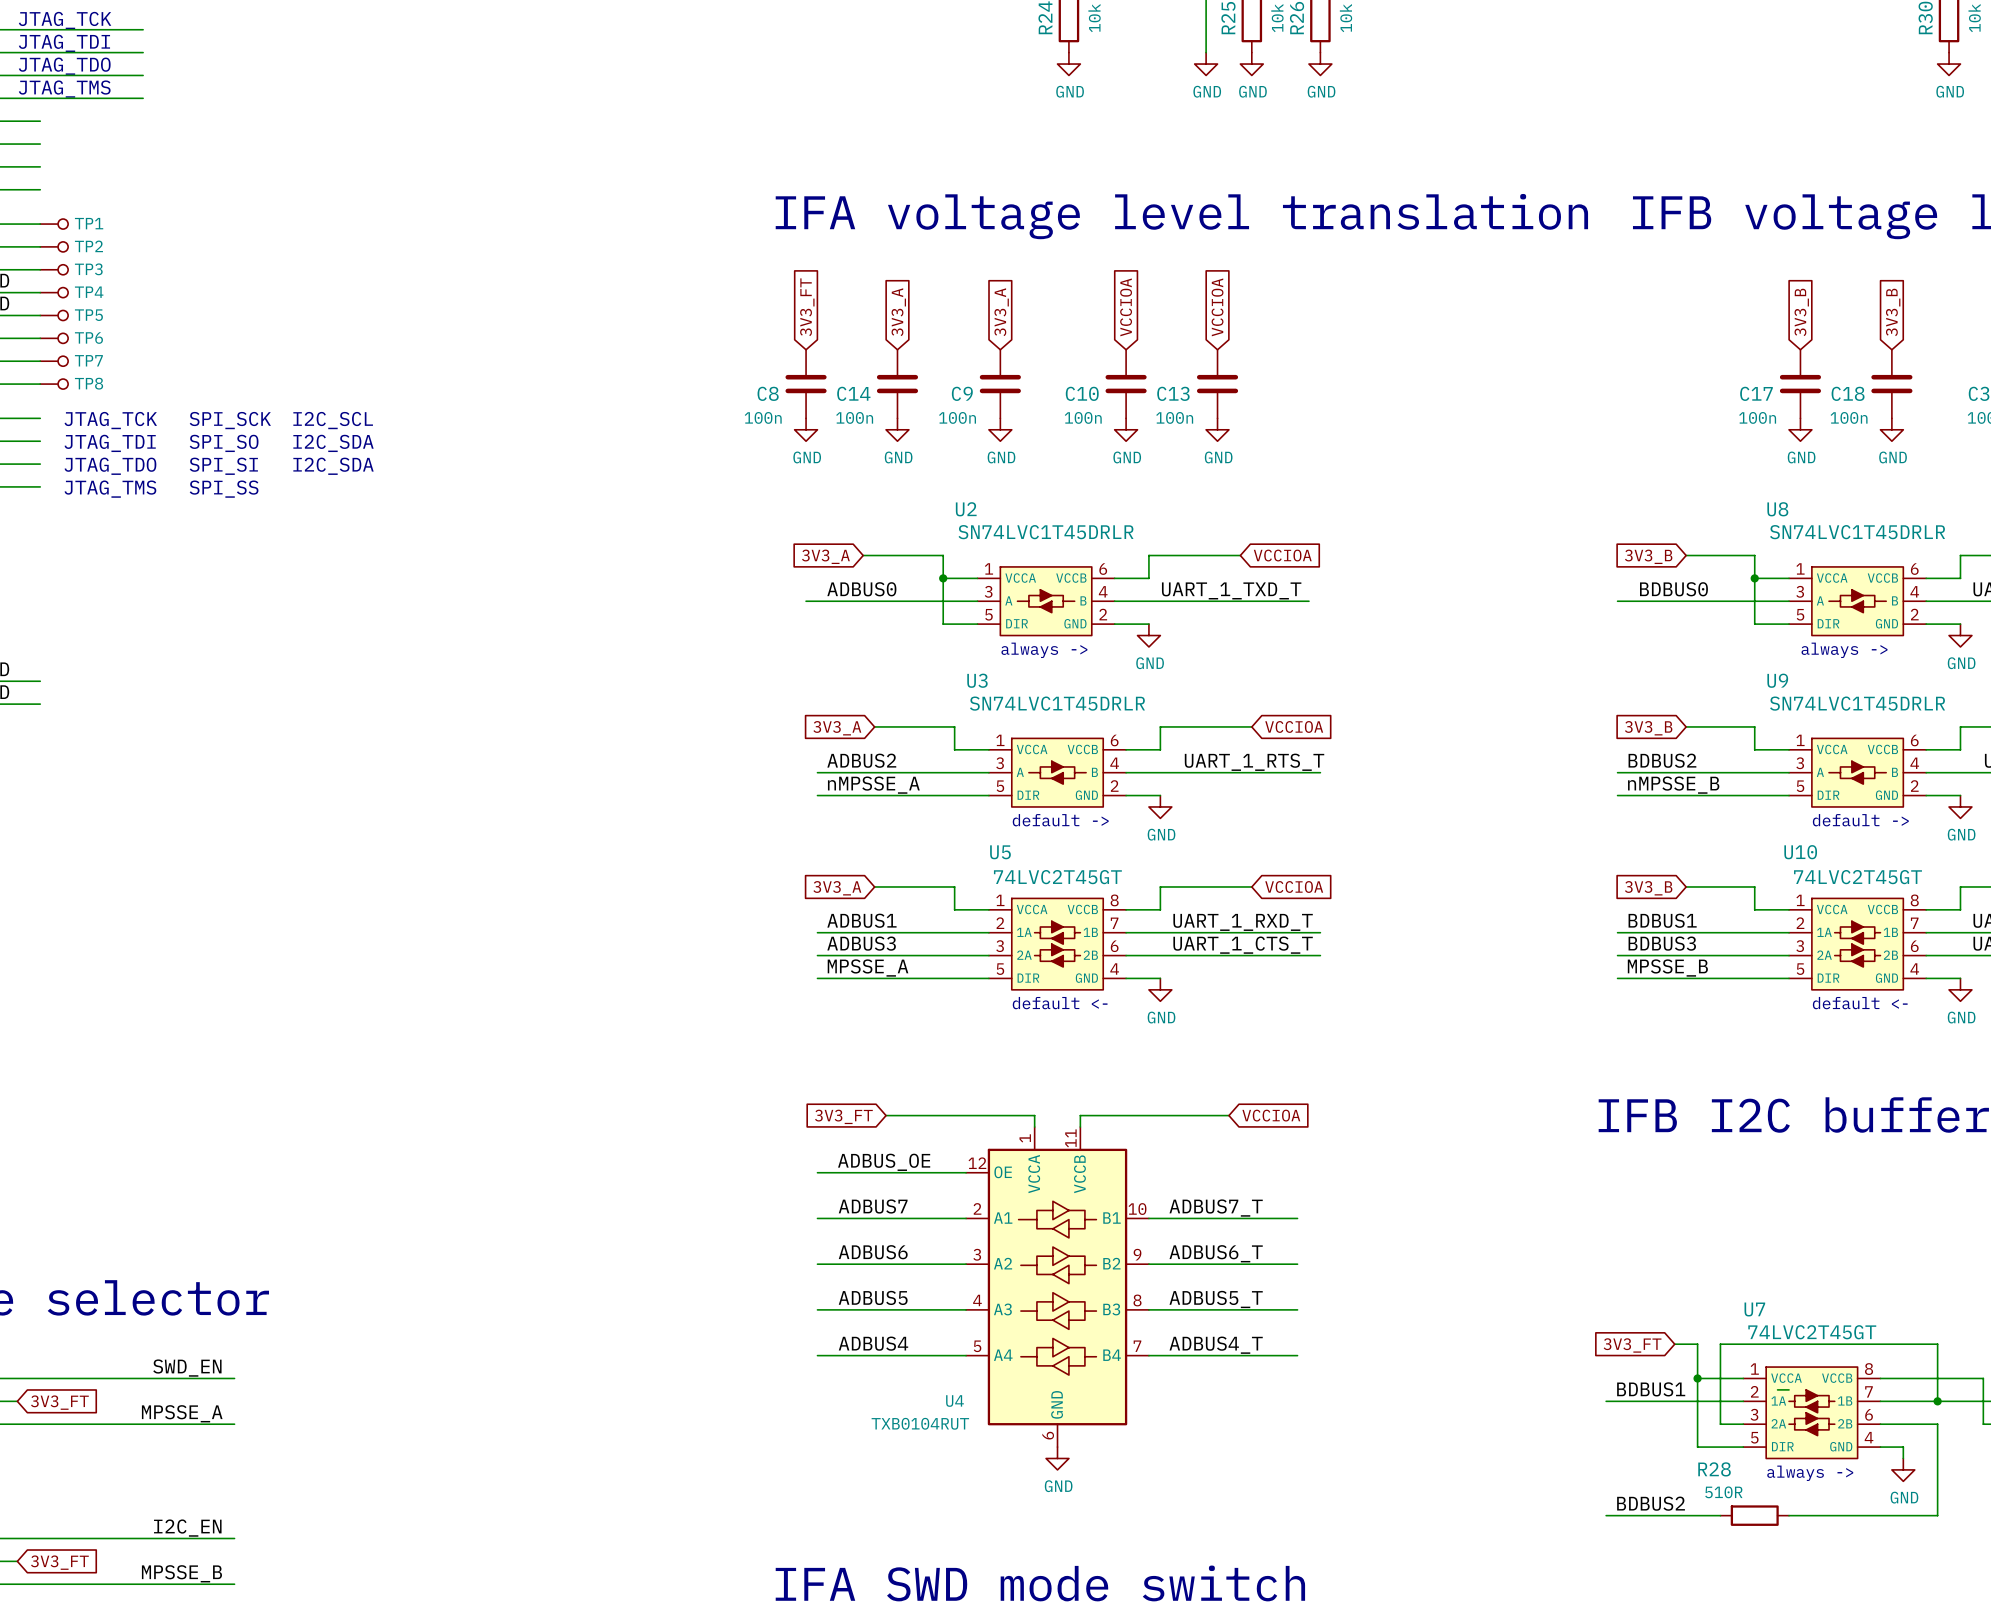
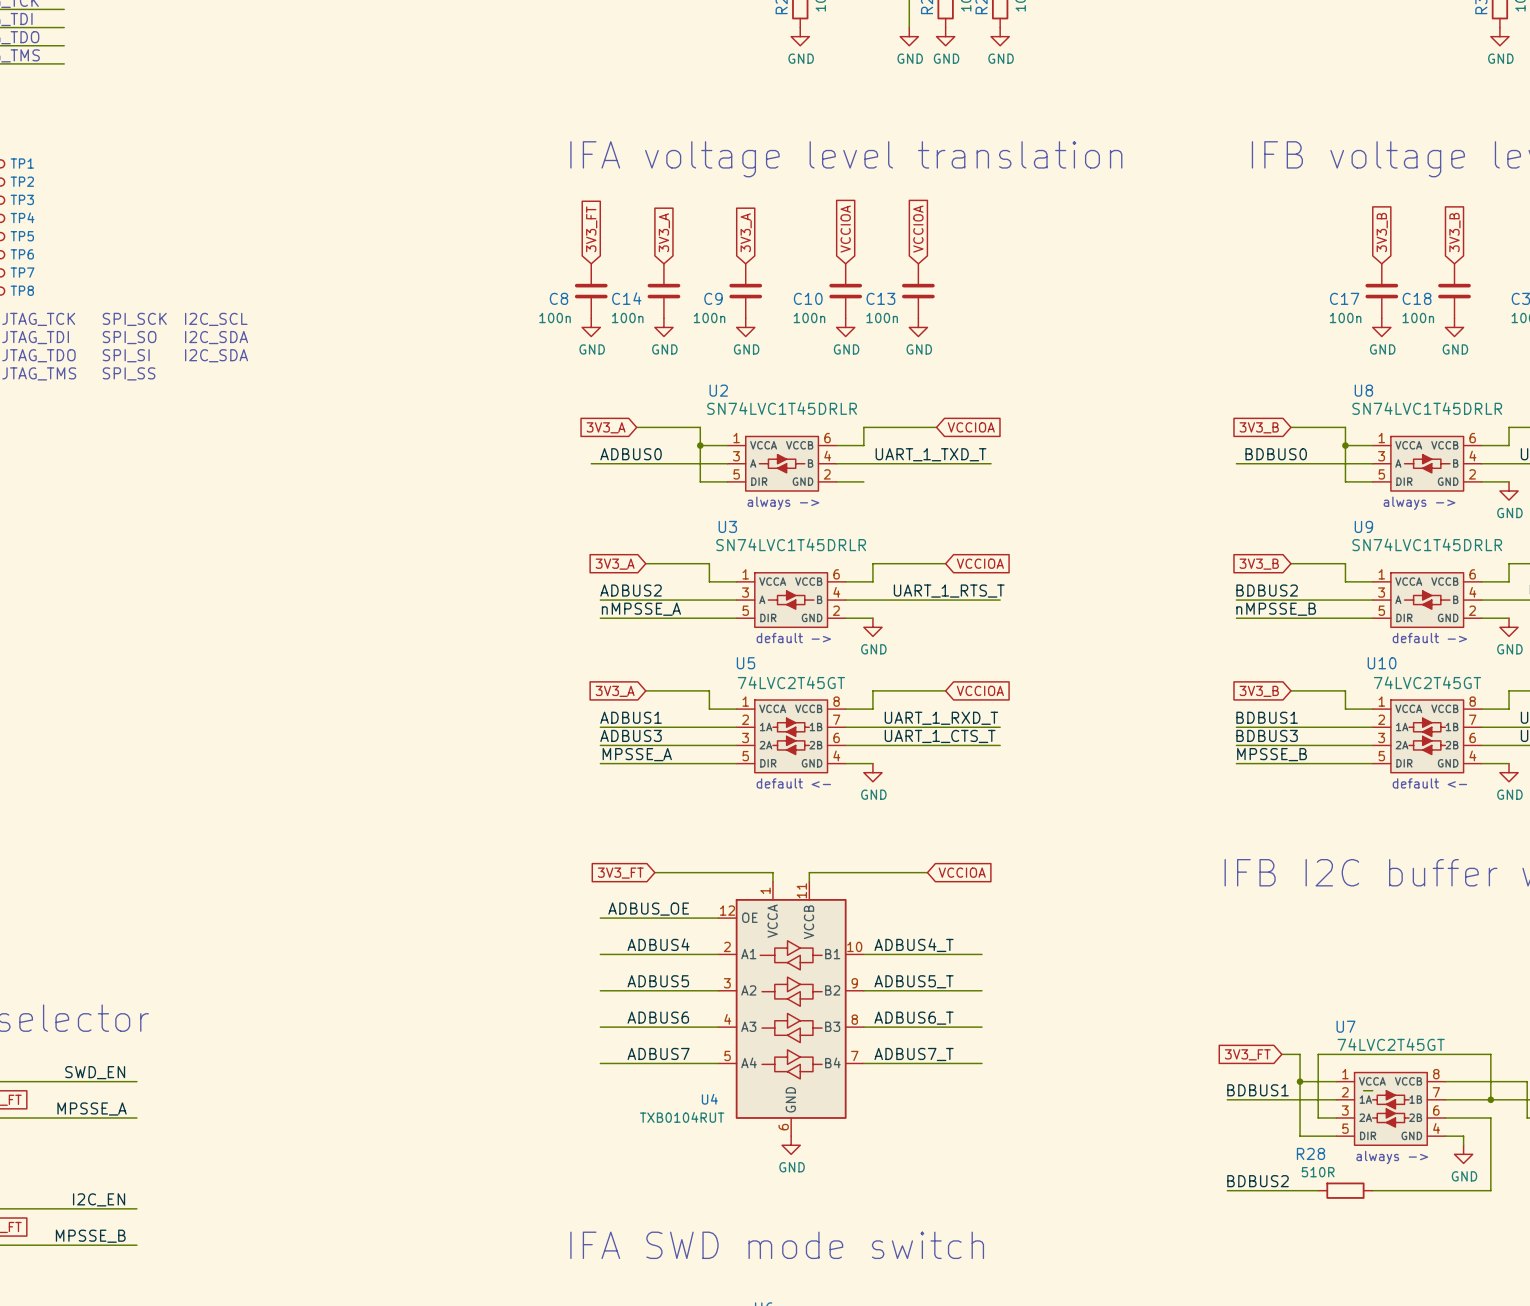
power symbol: GND (1148, 635) -> none
label position: ADBUS7 (873, 1206) -> ADBUS7 (658, 1053)
label: ADBUS7_T (1216, 1208) -> ADBUS4_T (914, 945)
label position: ADBUS6 (873, 1252) -> ADBUS6 (658, 1017)
label: ADBUS6_T (1216, 1253) -> ADBUS5_T (914, 981)
label position: ADBUS5 (873, 1297) -> ADBUS5 (658, 981)
label: ADBUS5_T (1216, 1299) -> ADBUS6_T (914, 1018)
label position: ADBUS4 (873, 1343) -> ADBUS4 (658, 944)
label: ADBUS4_T (1216, 1345) -> ADBUS7_T (914, 1054)

